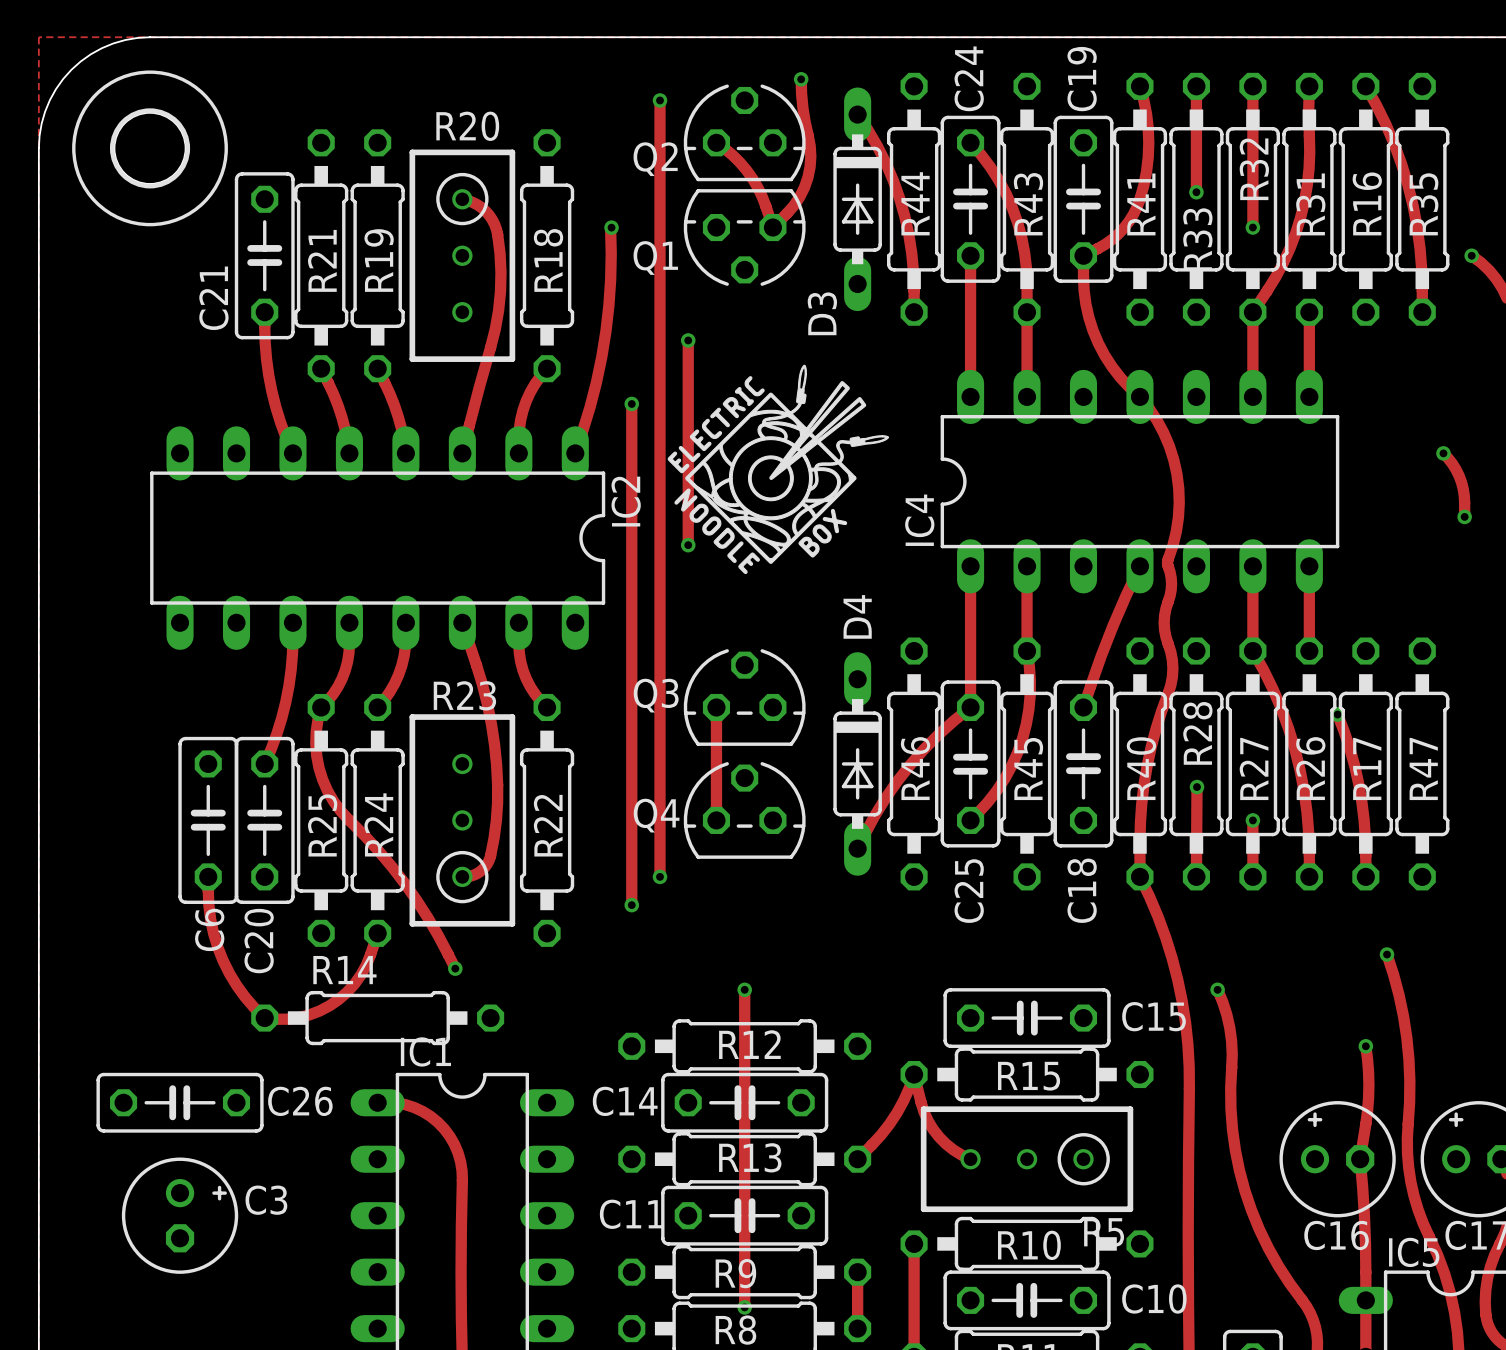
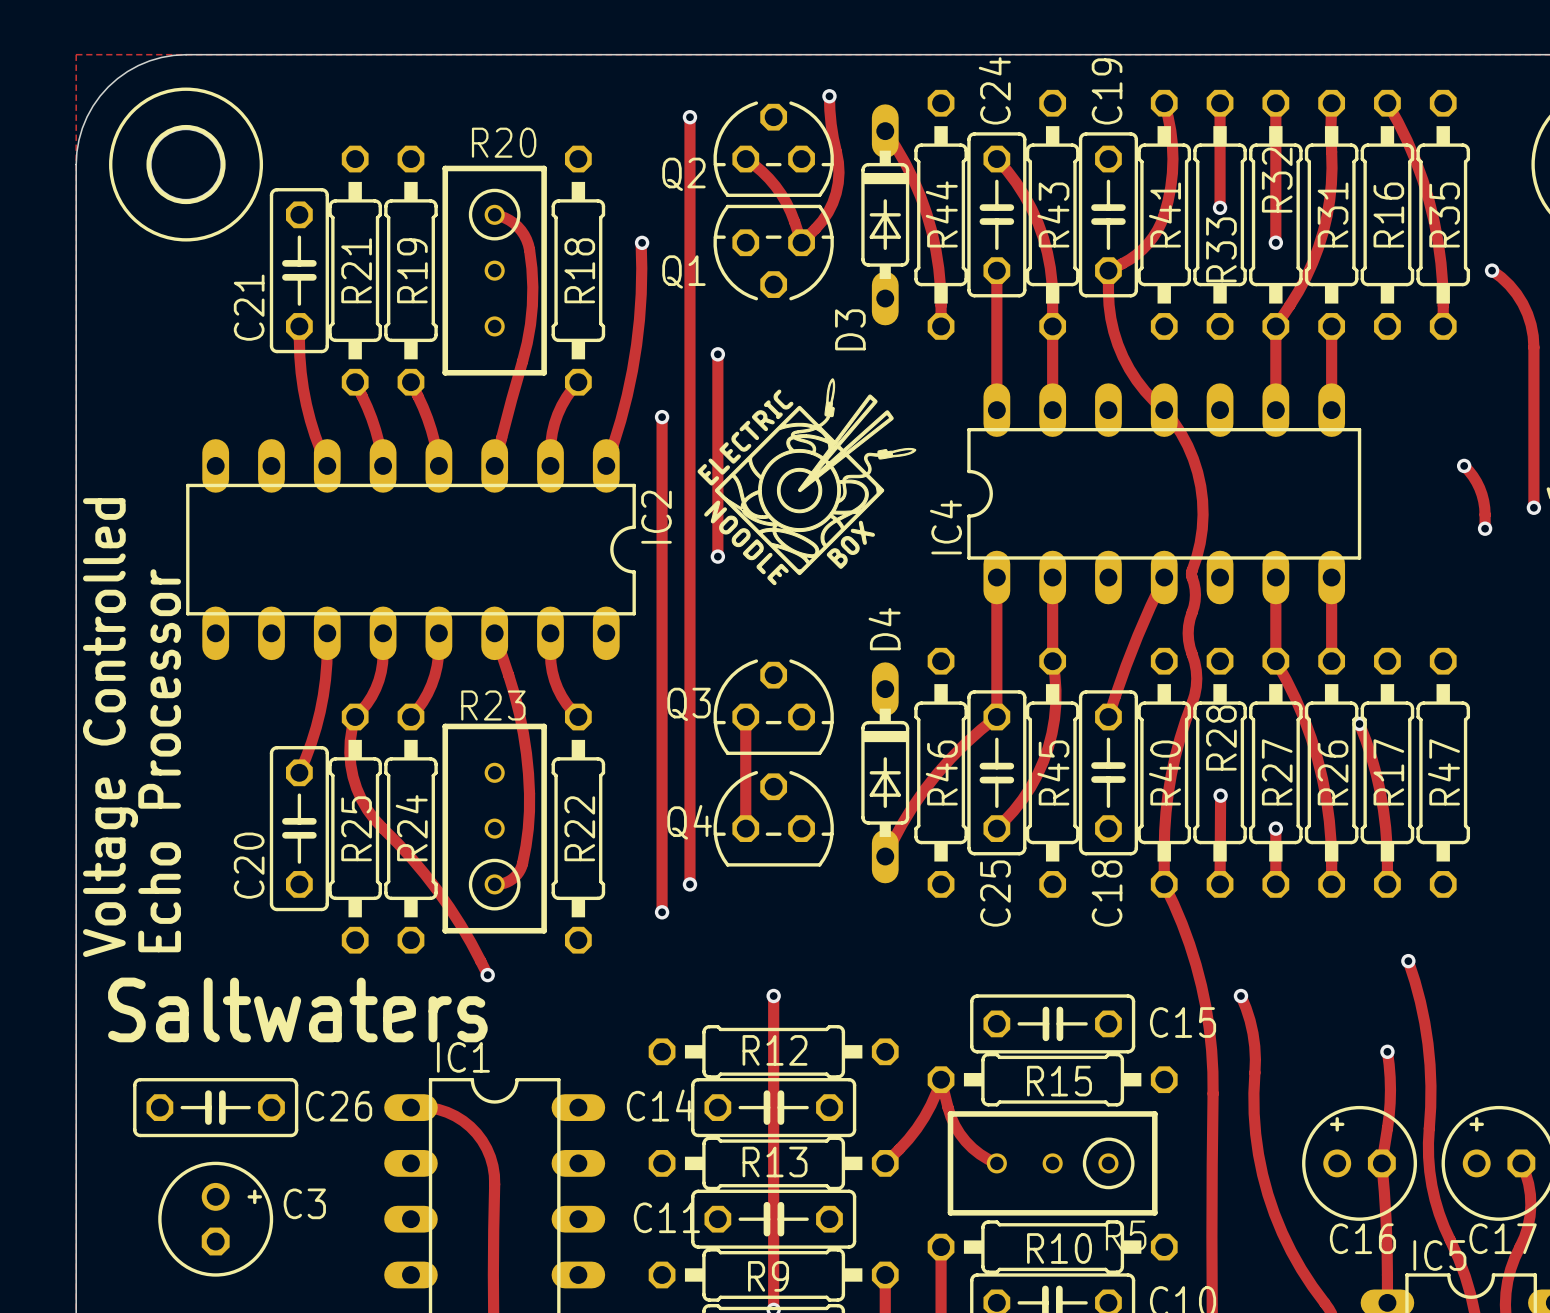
text: none -> Voltage Controlled (110, 727)
text: none -> Echo Processor (159, 760)
C6: (208, 820) -> none
track: (208, 876) (210, 919) (223, 960) (236, 985) (264, 1018) (287, 1019) (309, 1015) (338, 999) (361, 974) (377, 933) -> none
C20 name position: C20 (259, 941) -> C20 (249, 865)
text: none -> Saltwaters (297, 1009)
R14: (377, 1018) -> none

